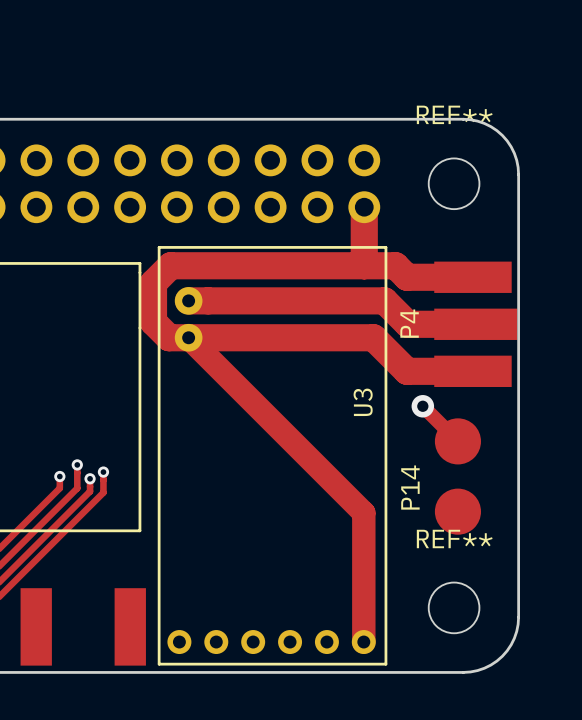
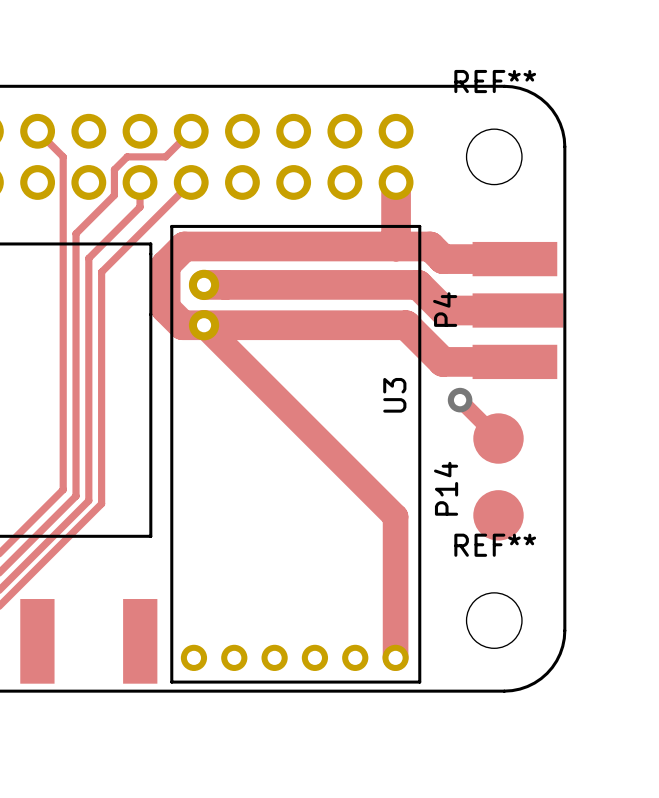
track: none -> (37, 131) (63, 156) (63, 476)
track: (77, 464) (77, 488) (71, 494) -> (191, 131) (165, 156) (127, 156) (114, 169) (114, 195) (76, 233) (76, 496)
via: (77, 464) -> none
track: (103, 472) (103, 492) (94, 501) -> (191, 182) (101, 272) (101, 503)
via: (103, 472) -> none
via: (59, 476) -> none
track: (90, 478) (90, 491) (83, 498) -> (140, 182) (140, 207) (88, 258) (88, 500)
via: (90, 478) -> none

